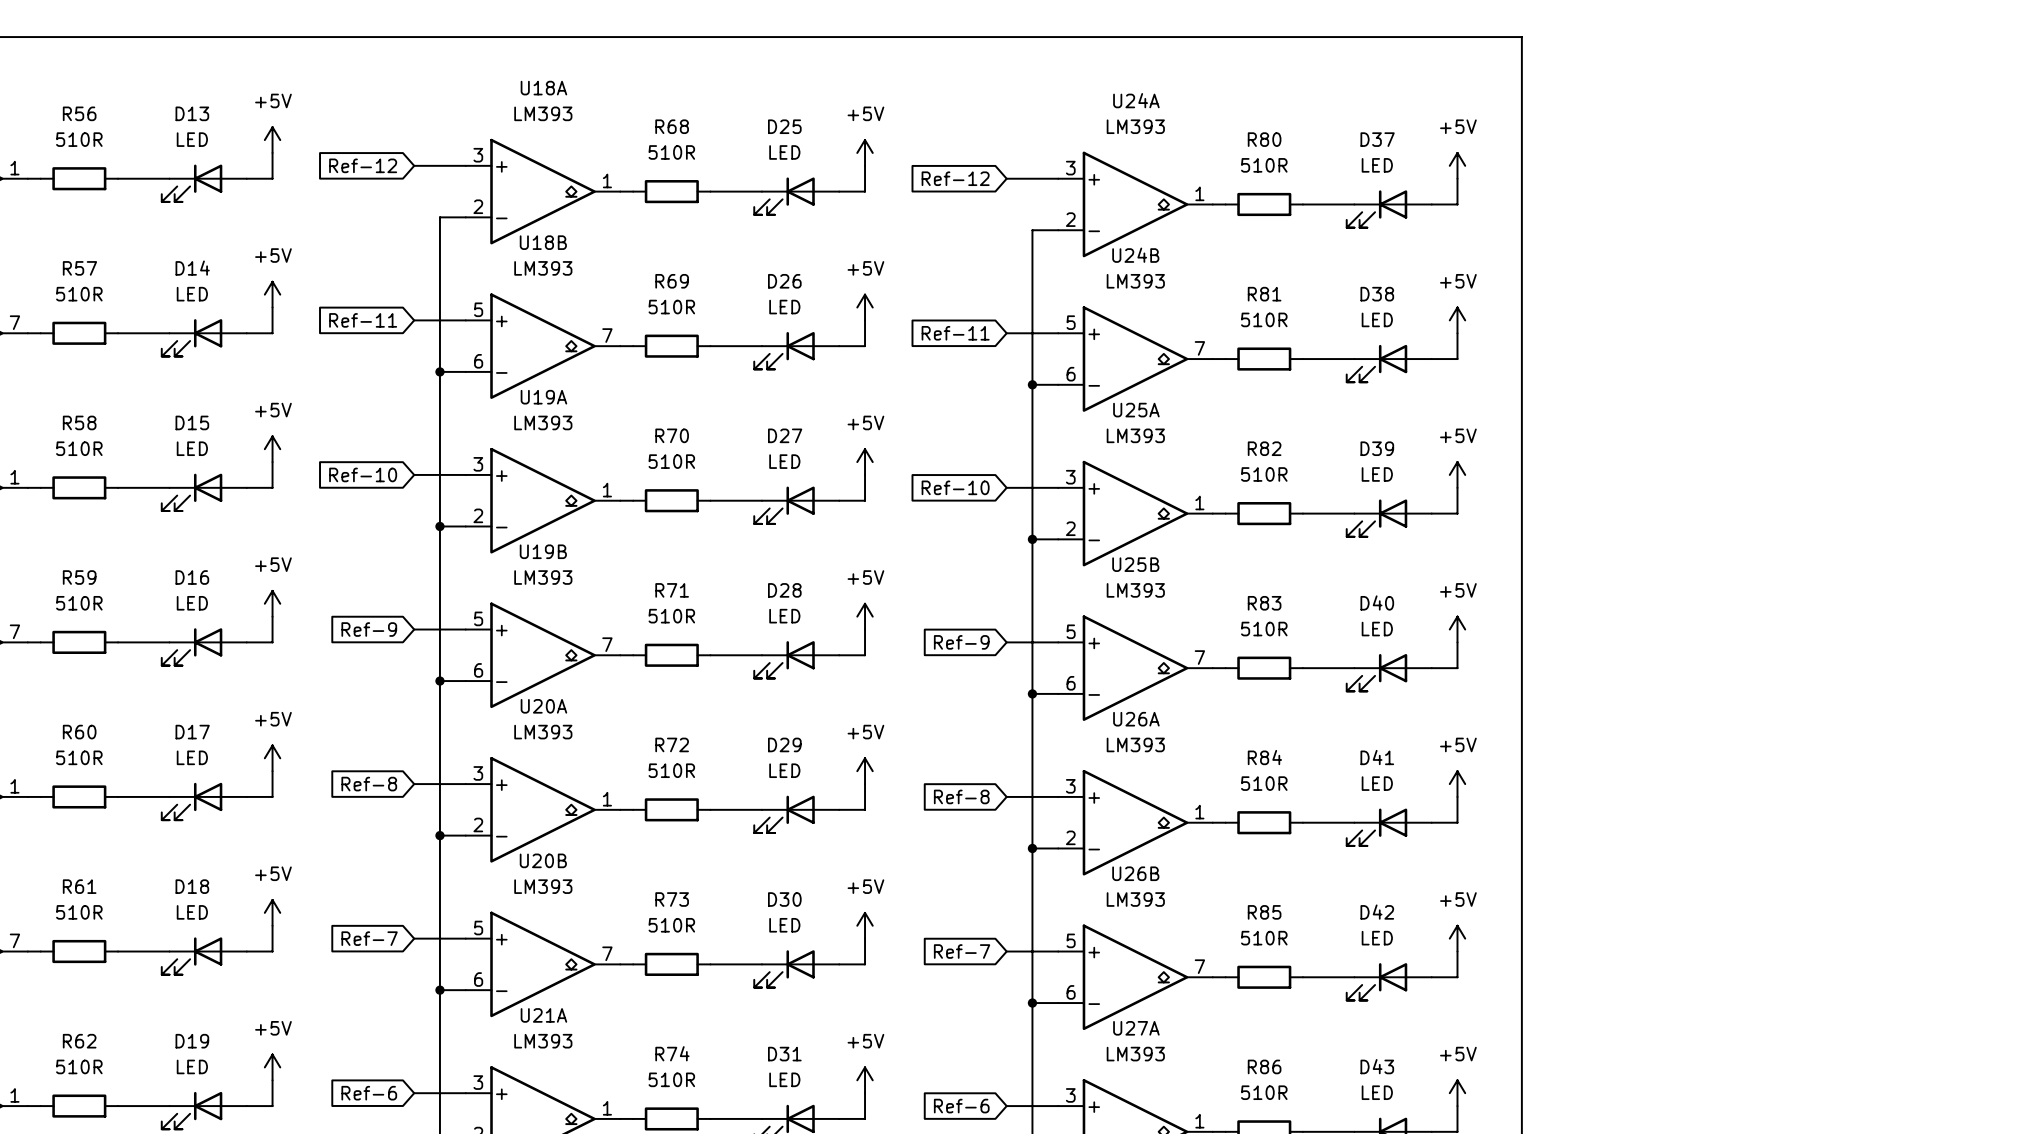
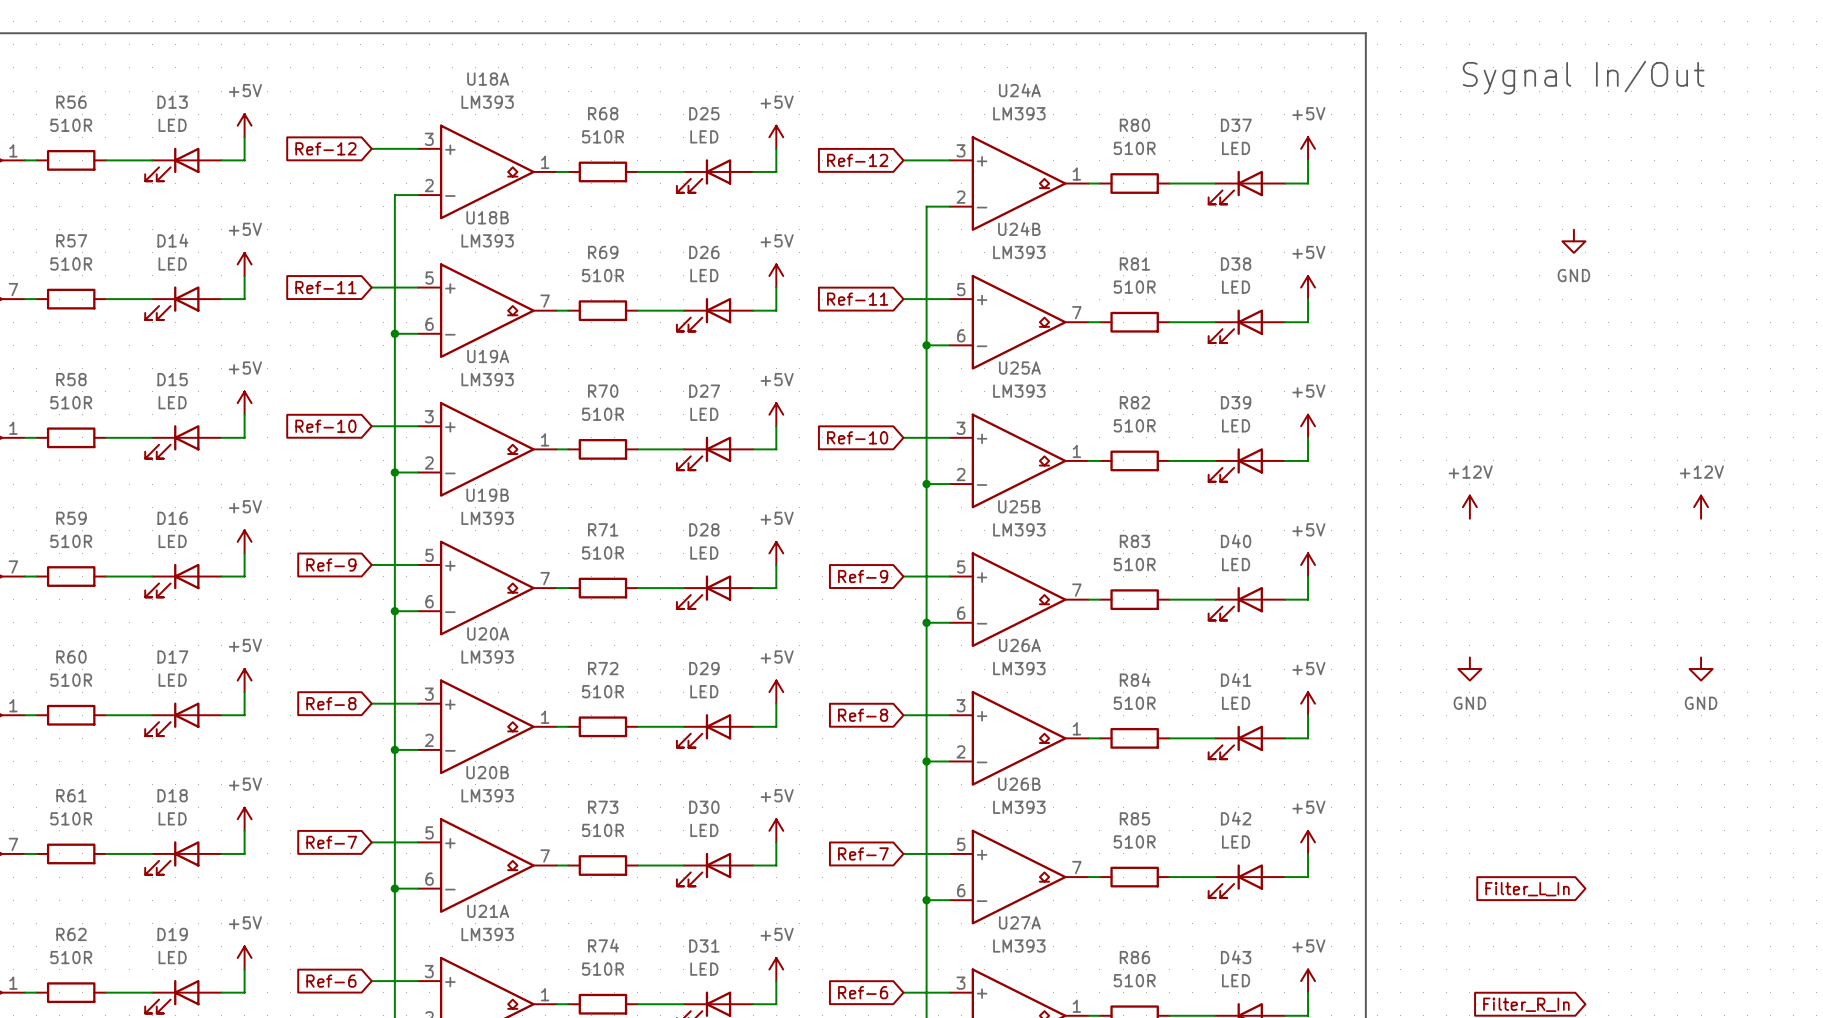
text: none -> Sygnal In/Out (1583, 77)
power symbol: none -> GND (1573, 241)
power symbol: none -> +12V (1469, 507)
power symbol: none -> +12V (1701, 507)
power symbol: none -> GND (1469, 669)
power symbol: none -> GND (1701, 669)
global label: none -> Filter_L_In (1527, 889)
global label: none -> Filter_R_In (1526, 1004)

